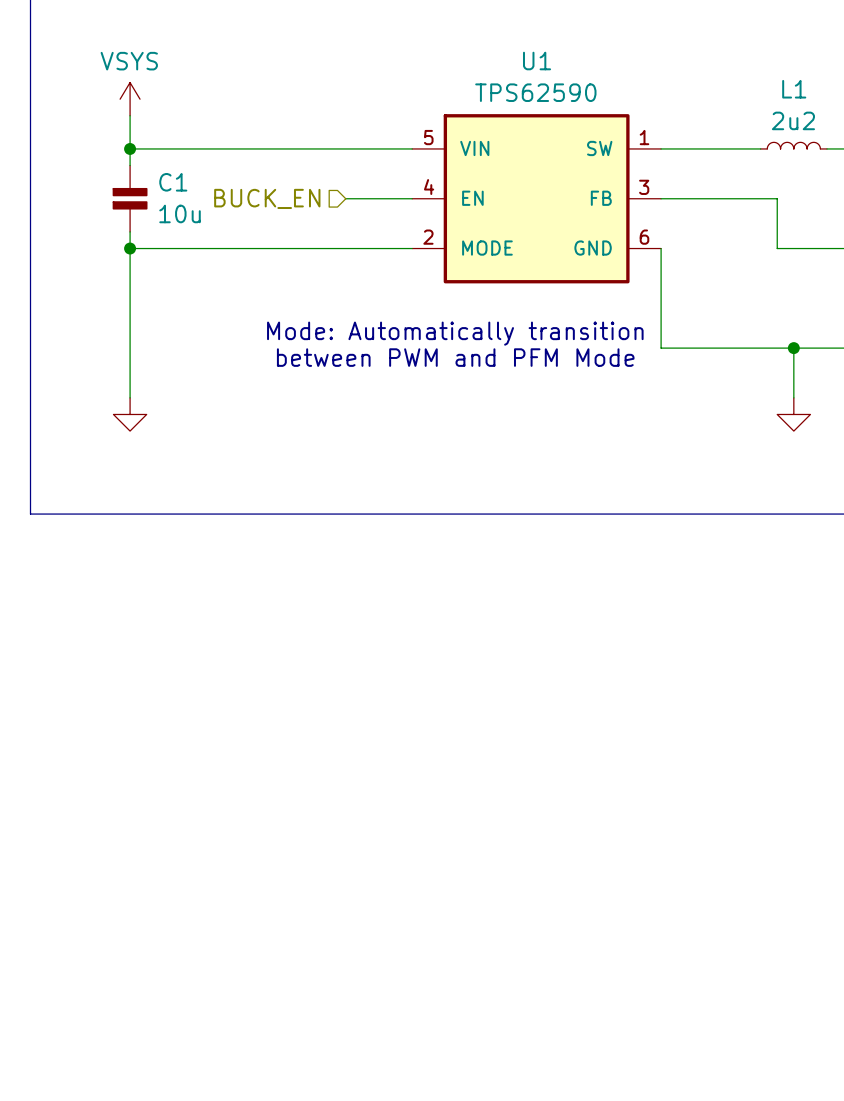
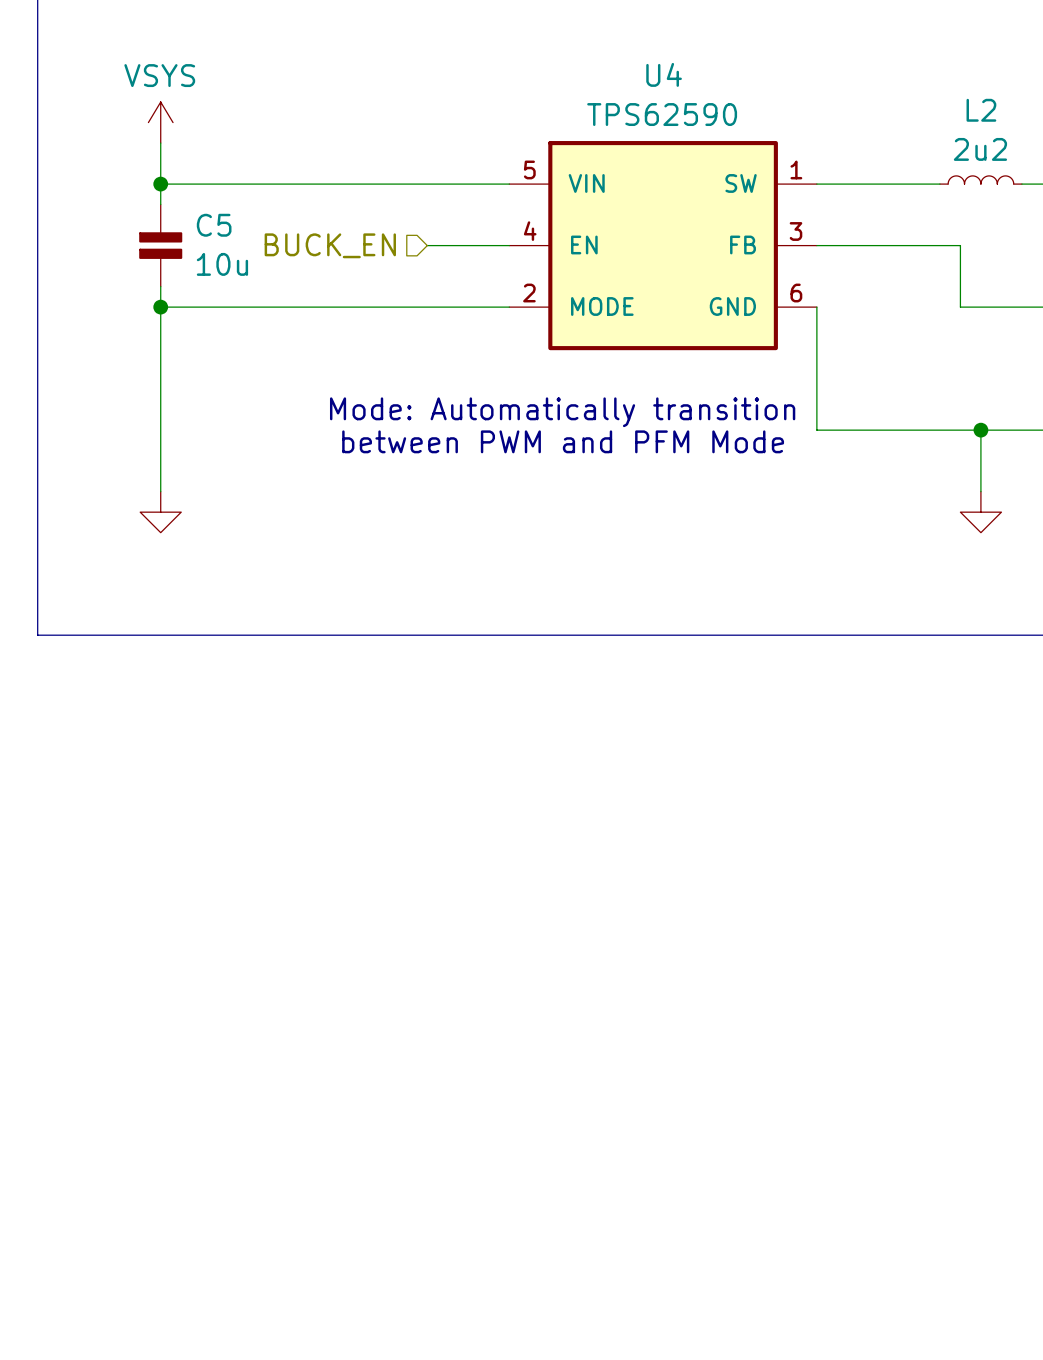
U1 name: U1 (537, 61) -> U4 (664, 74)
L1 name: L1 (794, 89) -> L2 (981, 110)
C1 name: C1 (173, 182) -> C5 (214, 225)

